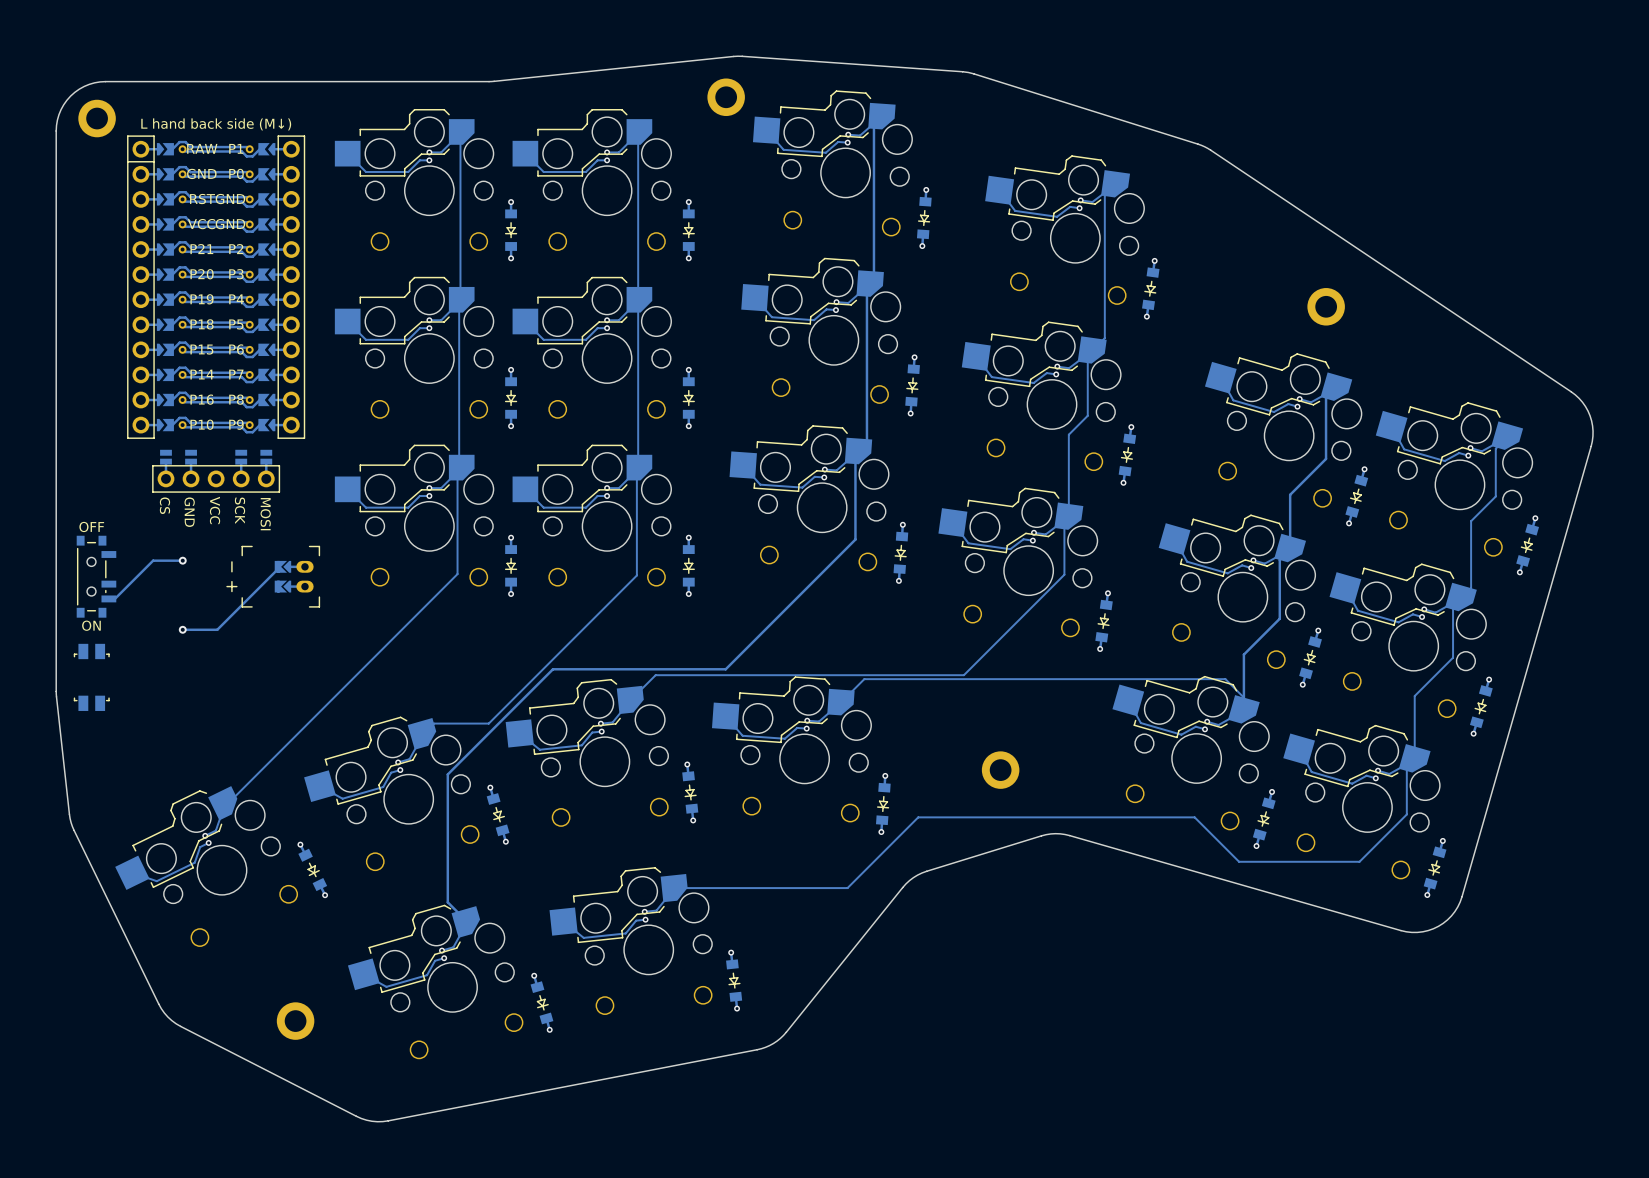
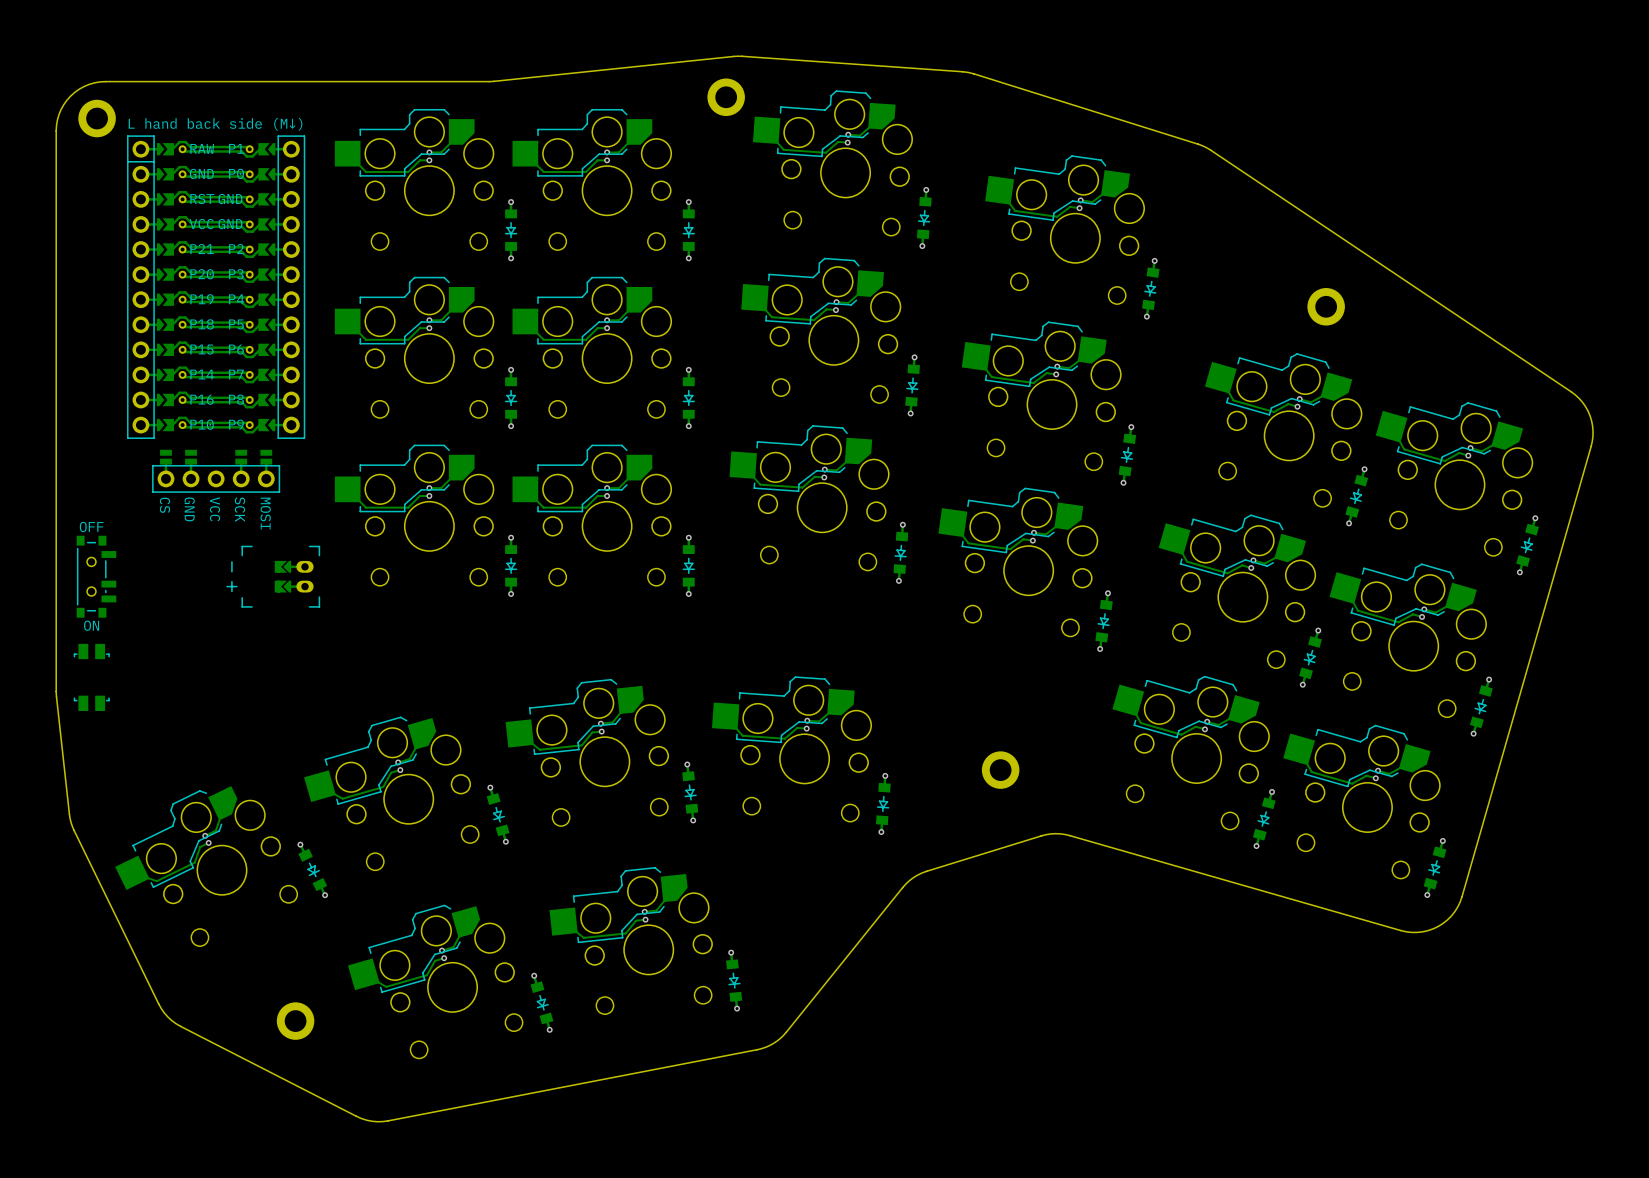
track: (881, 116) (873, 124) (873, 280) (866, 287) (866, 442) (855, 454) (855, 539) (725, 669) (552, 669) (447, 774) (447, 902) (467, 921) -> none
track: (460, 133) (461, 299) -> none
track: (638, 133) (639, 299) -> none
track: (1115, 184) (1104, 195) (1104, 338) (1087, 355) (1087, 415) (1068, 434) (1068, 517) (1064, 521) (1064, 574) (963, 675) (655, 675) (630, 699) -> none
track: (638, 301) (639, 467) -> none
track: (459, 302) (459, 465) (461, 467) -> none
track: (1336, 388) (1326, 398) (1326, 458) (1290, 494) (1290, 549) (1279, 560) (1279, 618) (1243, 654) (1243, 710) (1243, 697) (1225, 679) (864, 679) (840, 702) -> none
track: (1507, 437) (1495, 448) (1495, 496) (1471, 521) (1471, 588) (1453, 606) (1453, 657) (1414, 696) (1414, 759) (1406, 767) (1406, 814) (1359, 861) (1239, 861) (1194, 817) (918, 817) (847, 888) (674, 888) -> none
track: (636, 470) (636, 575) (488, 723) (433, 723) (423, 733) -> none
track: (457, 471) (457, 574) (228, 803) (225, 803) -> none
track: (182, 560) (153, 560) (114, 598) (108, 598) -> none
via: (182, 560) -> none
track: (277, 566) (277, 569) (217, 629) (182, 629) -> none
via: (182, 629) -> none

